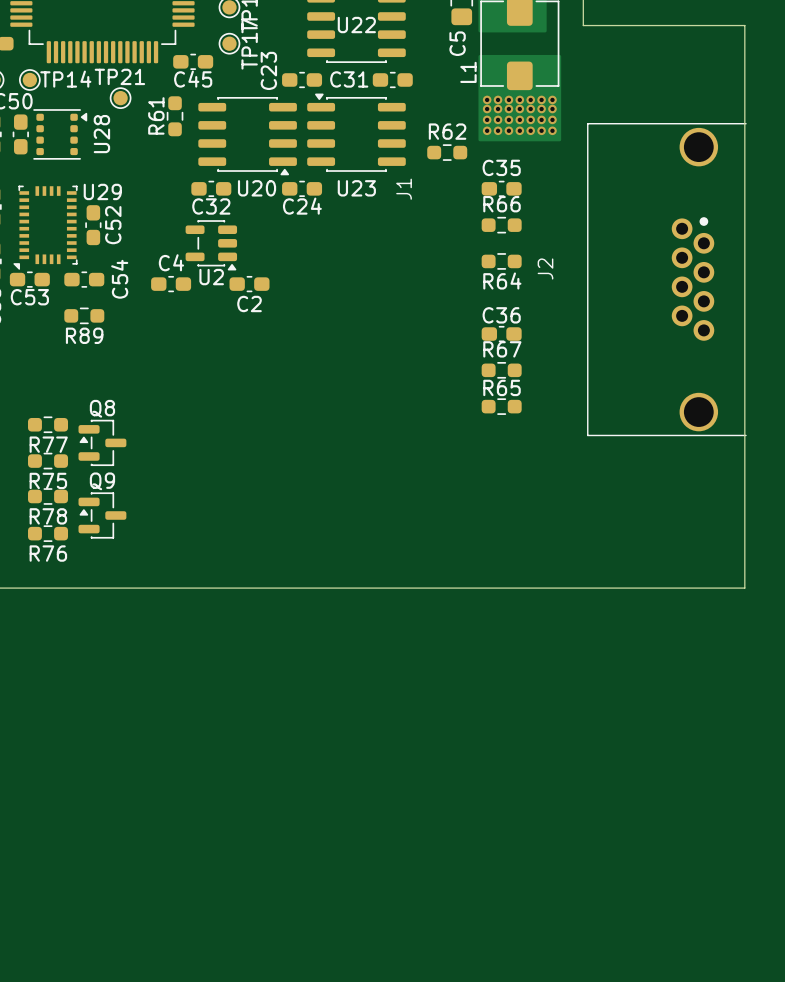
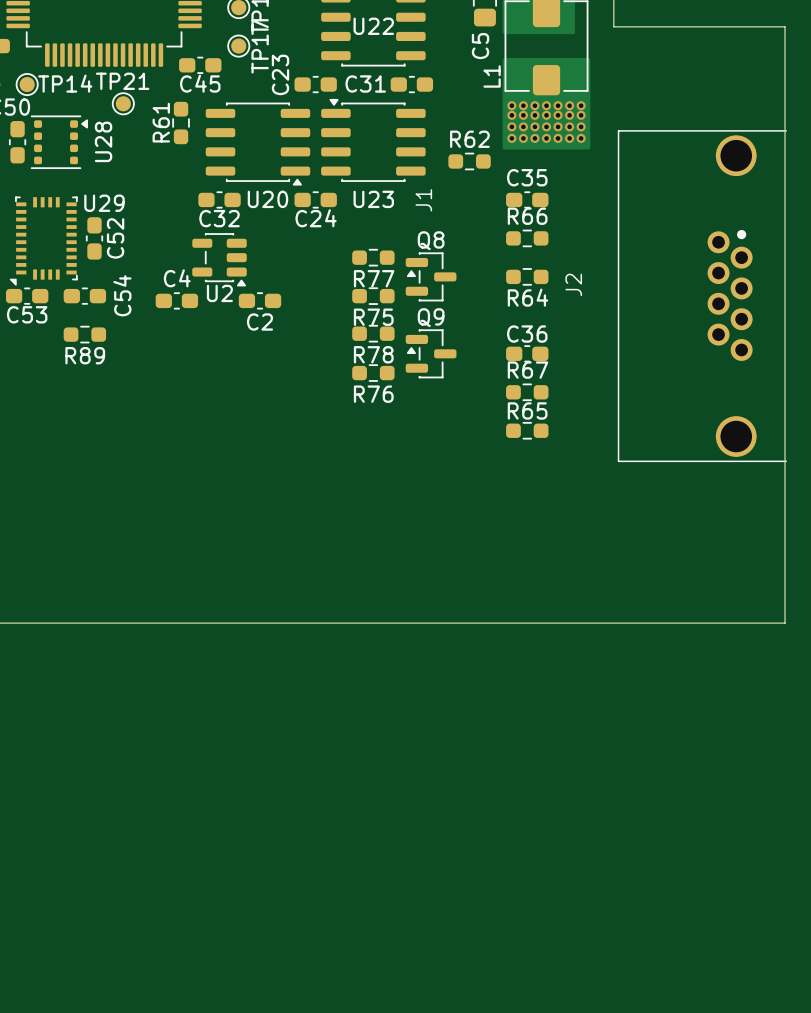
R77 position: (48, 424) -> (373, 257)
Q8 position: (102, 442) -> (431, 276)
R75 position: (48, 461) -> (373, 296)
R78 position: (48, 496) -> (373, 333)
Q9 position: (102, 515) -> (431, 353)
R76 position: (48, 533) -> (373, 373)

